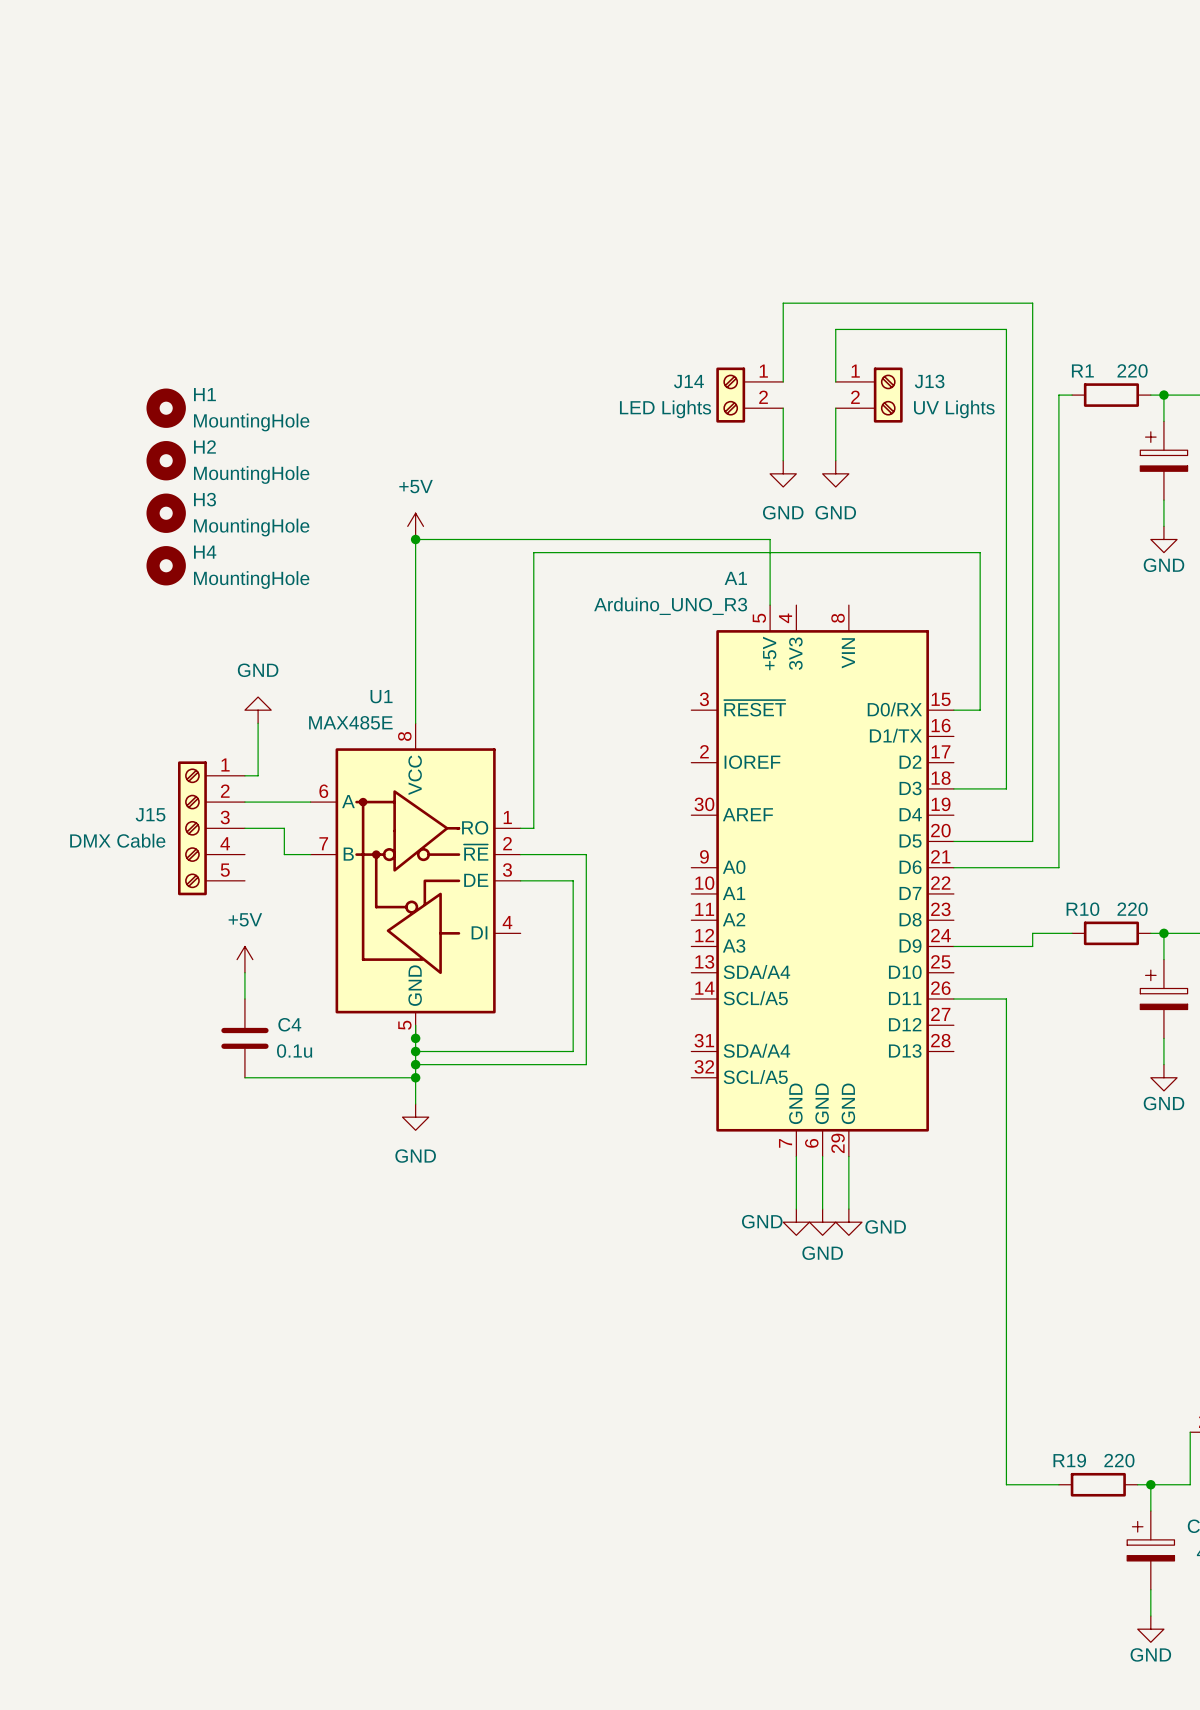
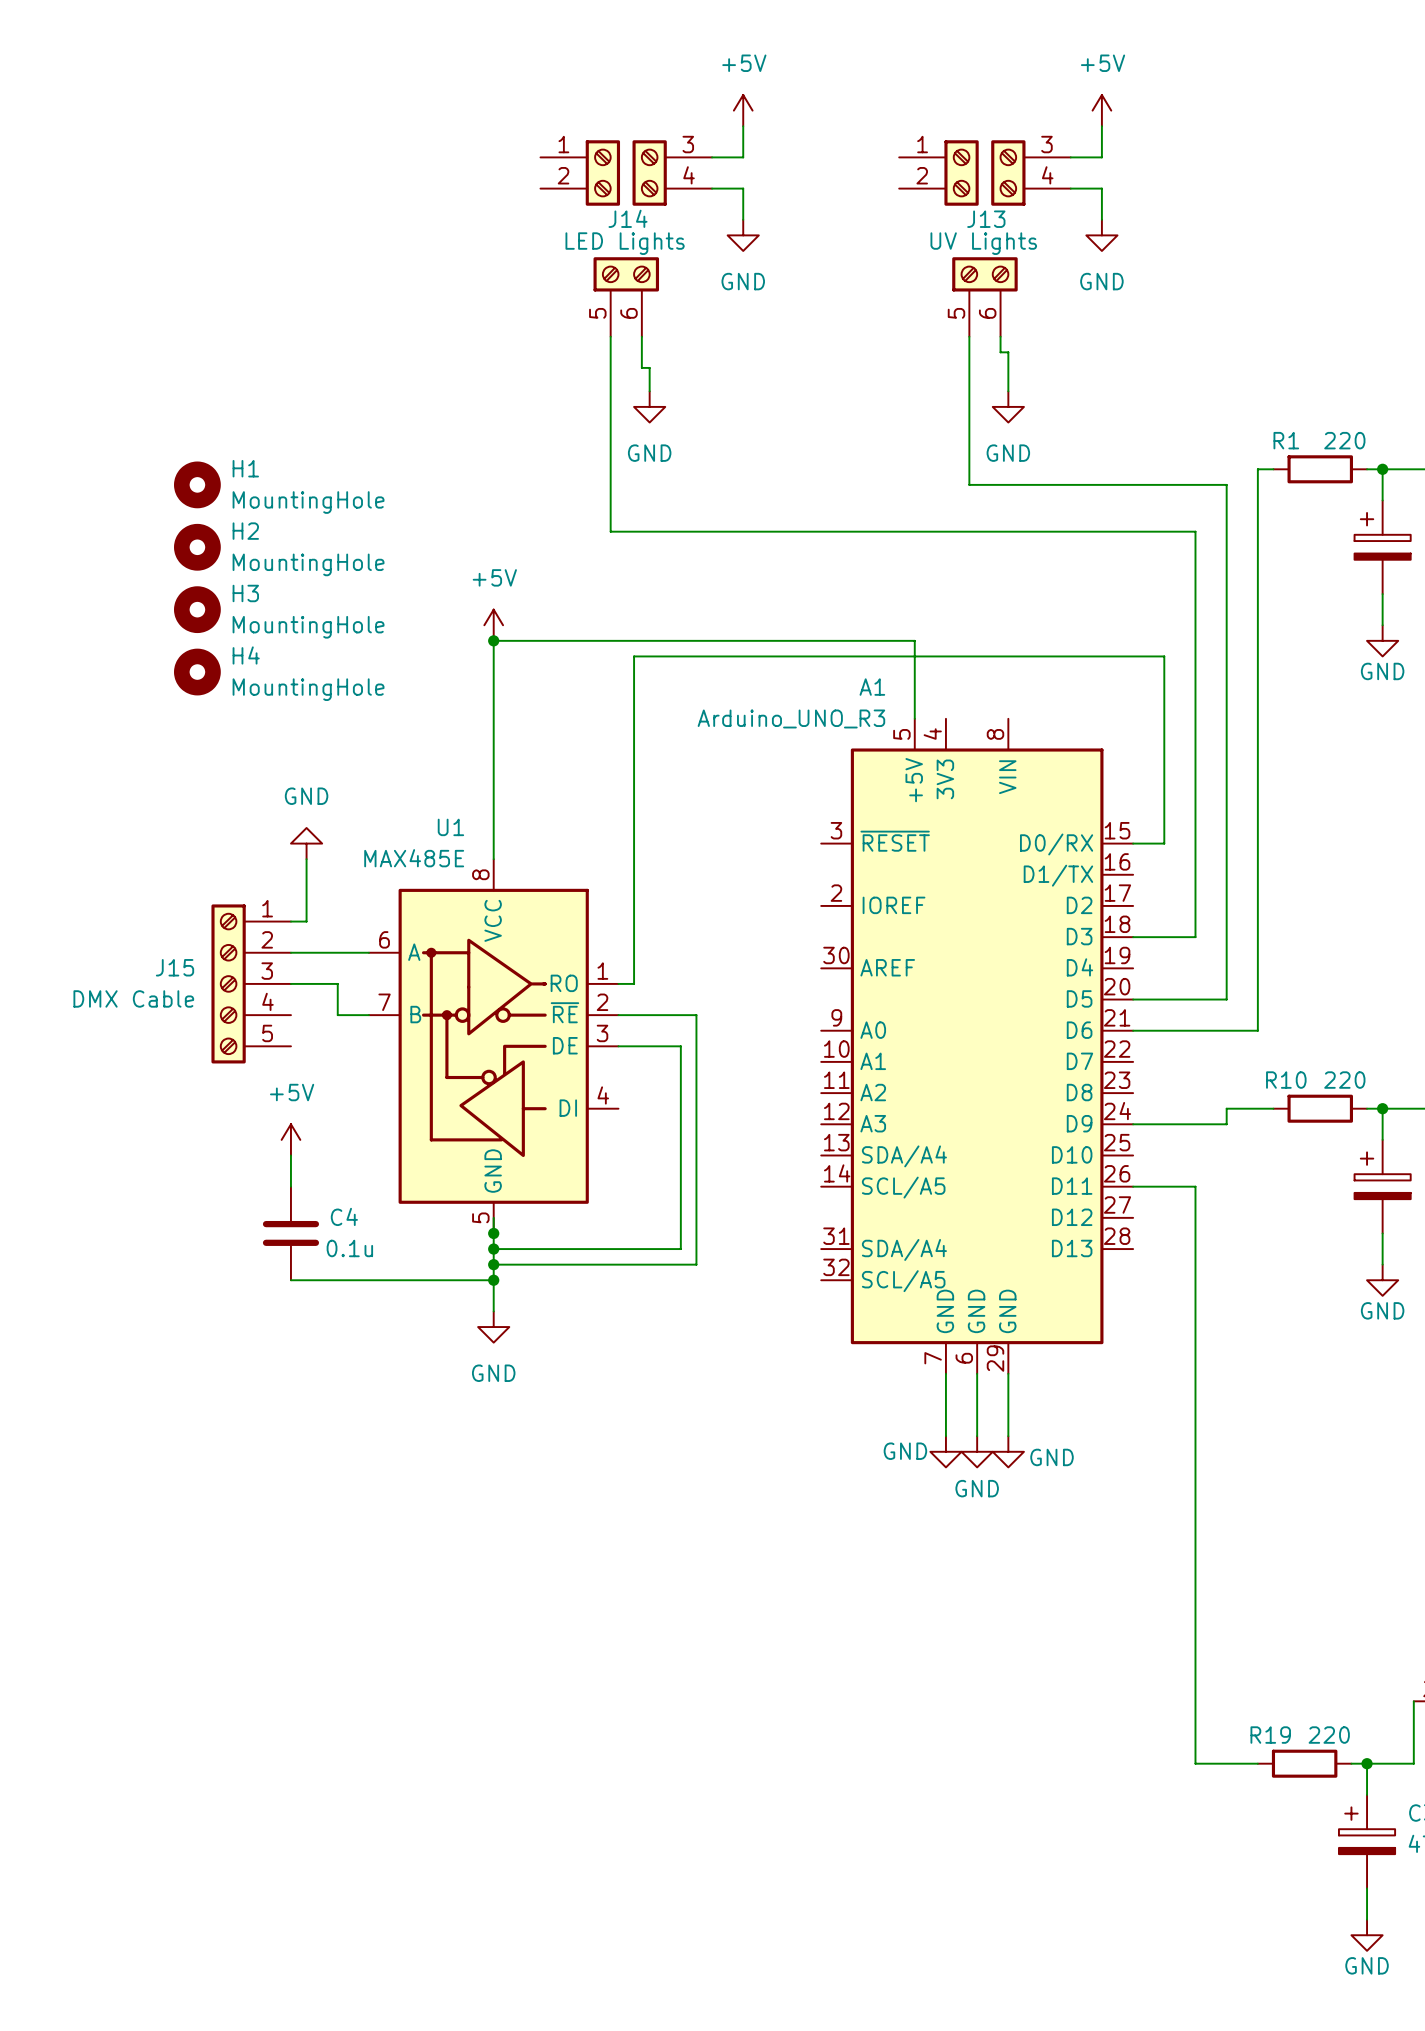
power symbol: none -> +5V (743, 110)
power symbol: none -> +5V (1101, 110)
wire: none -> (743, 126) (743, 157) (712, 157)
wire: none -> (1101, 126) (1101, 157) (1070, 157)
wire: none -> (712, 188) (743, 188) (743, 219)
wire: none -> (1070, 188) (1101, 188) (1101, 219)
power symbol: none -> GND (743, 235)
power symbol: none -> GND (1101, 235)
wire: none -> (641, 336) (641, 367) (649, 367) (649, 391)
wire: none -> (1000, 336) (1000, 352) (1008, 352) (1008, 391)
power symbol: none -> GND (649, 406)
power symbol: none -> GND (1008, 406)
J14 symbol: [716, 367, 784, 423] -> [540, 140, 713, 337]
J13 symbol: [835, 367, 903, 423] -> [899, 140, 1071, 337]
J14 name position: J14 (688, 381) -> J14 (628, 218)
wire: (783, 381) (783, 303) (1032, 303) (1032, 408) -> (969, 336) (969, 484) (1226, 484)
wire: (835, 381) (835, 329) (1006, 329) (1006, 447) -> (610, 336) (610, 531) (1195, 531)
J13 name position: J13 (929, 381) -> J13 (986, 219)
wire: (783, 408) (783, 460) -> none
wire: (835, 408) (835, 460) -> none
J14 value position: LED Lights (665, 409) -> LED Lights (625, 243)
J13 value position: UV Lights (954, 409) -> UV Lights (983, 243)
power symbol: GND (783, 473) -> none
power symbol: GND (835, 473) -> none

